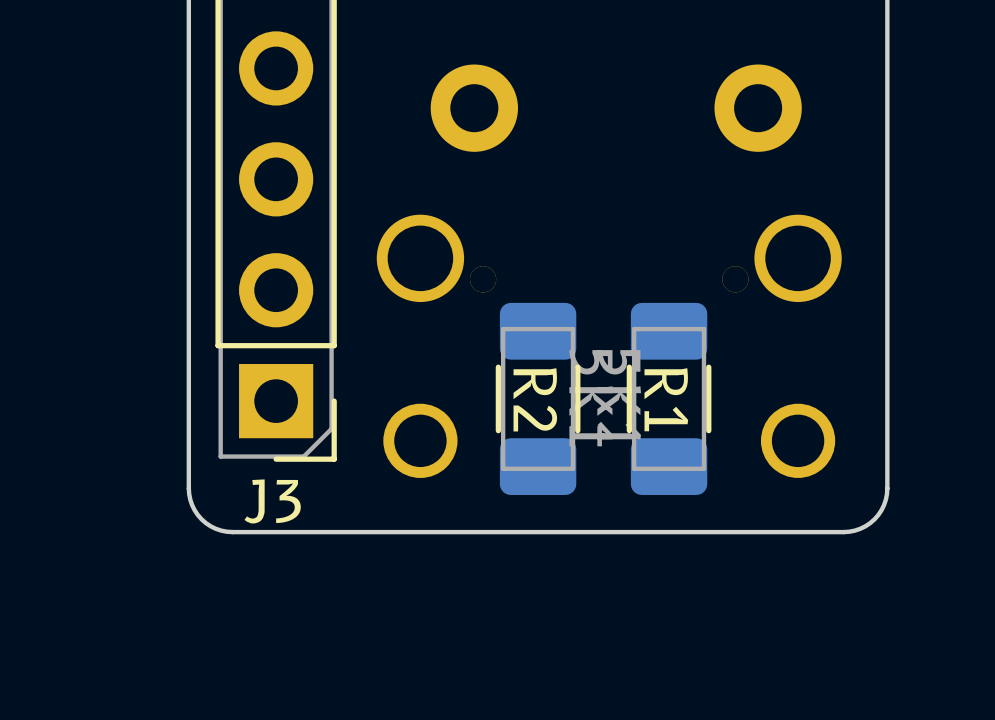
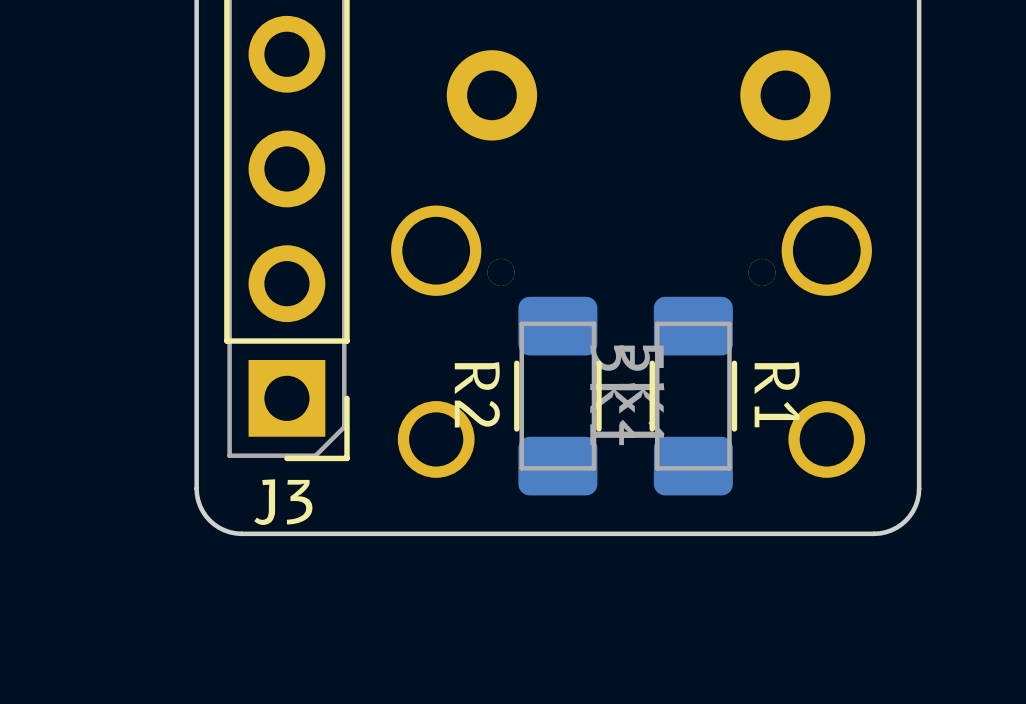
R2 name position: R2 (535, 399) -> R2 (477, 394)
R1 name position: R1 (666, 399) -> R1 (777, 394)

